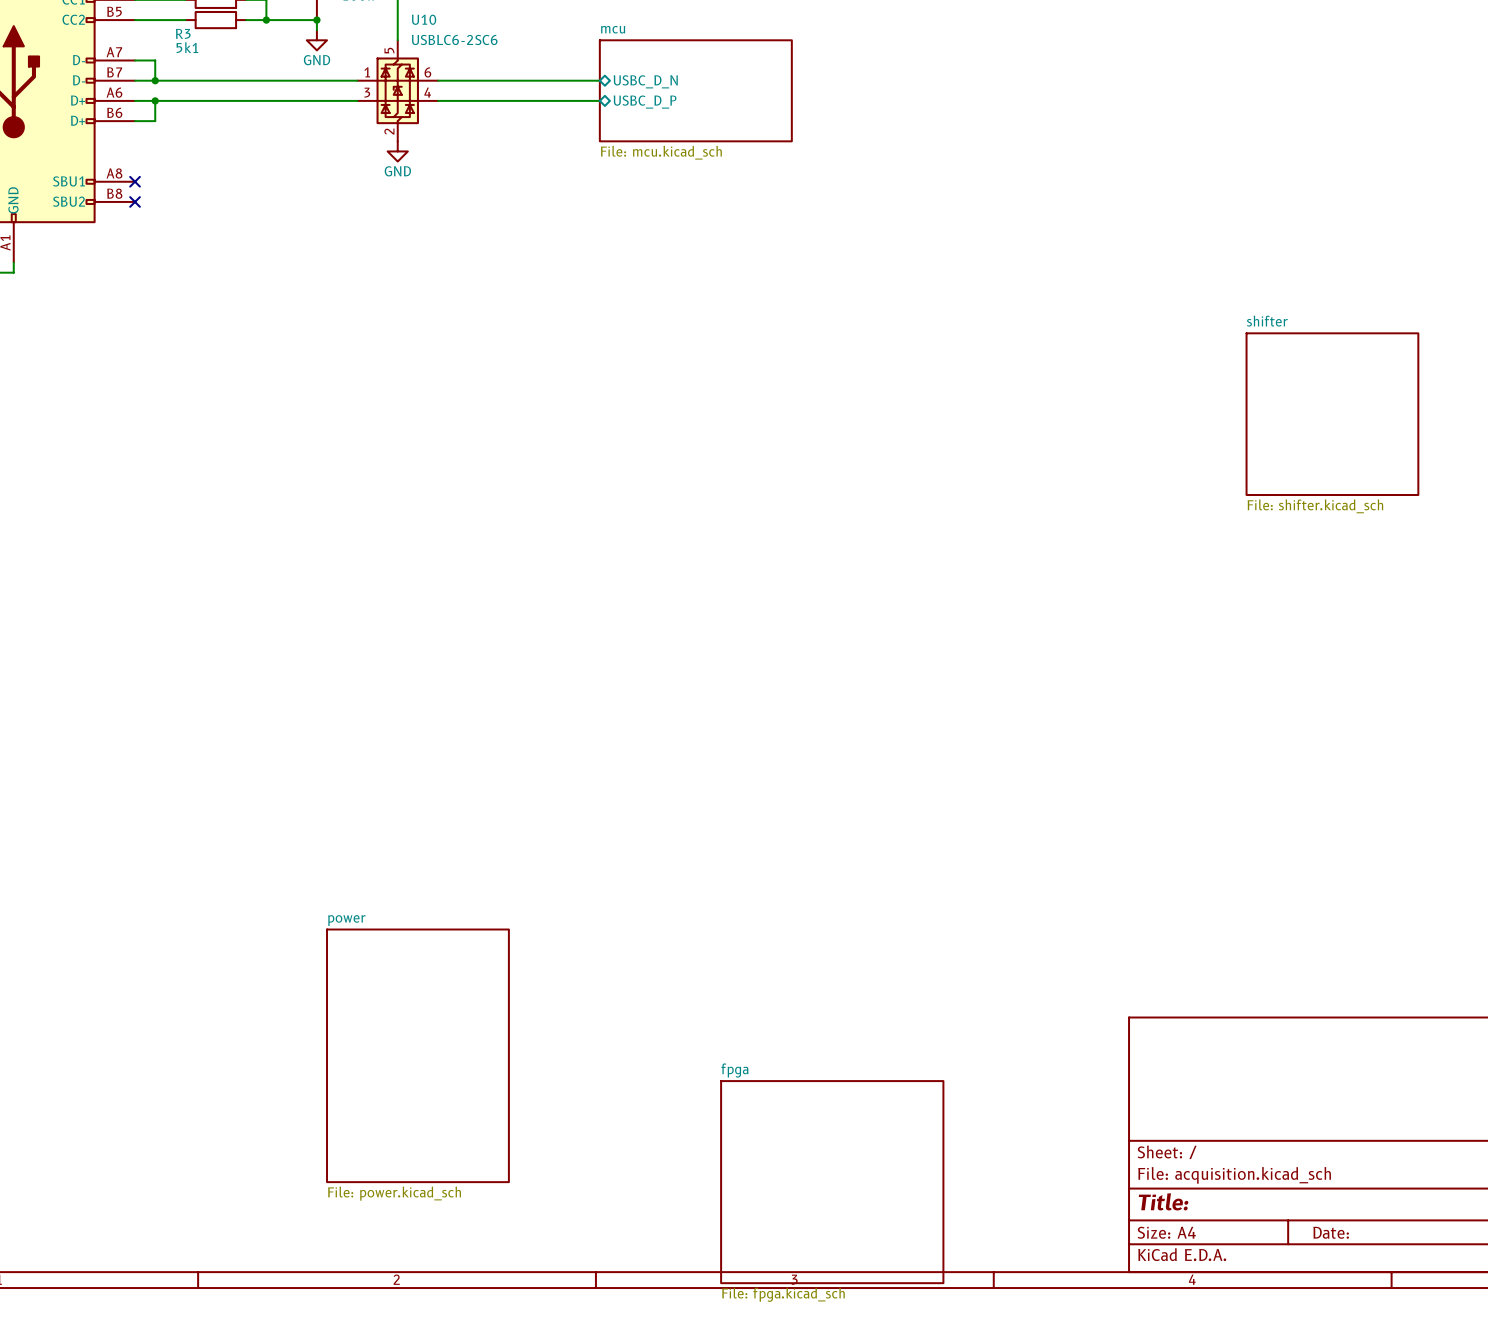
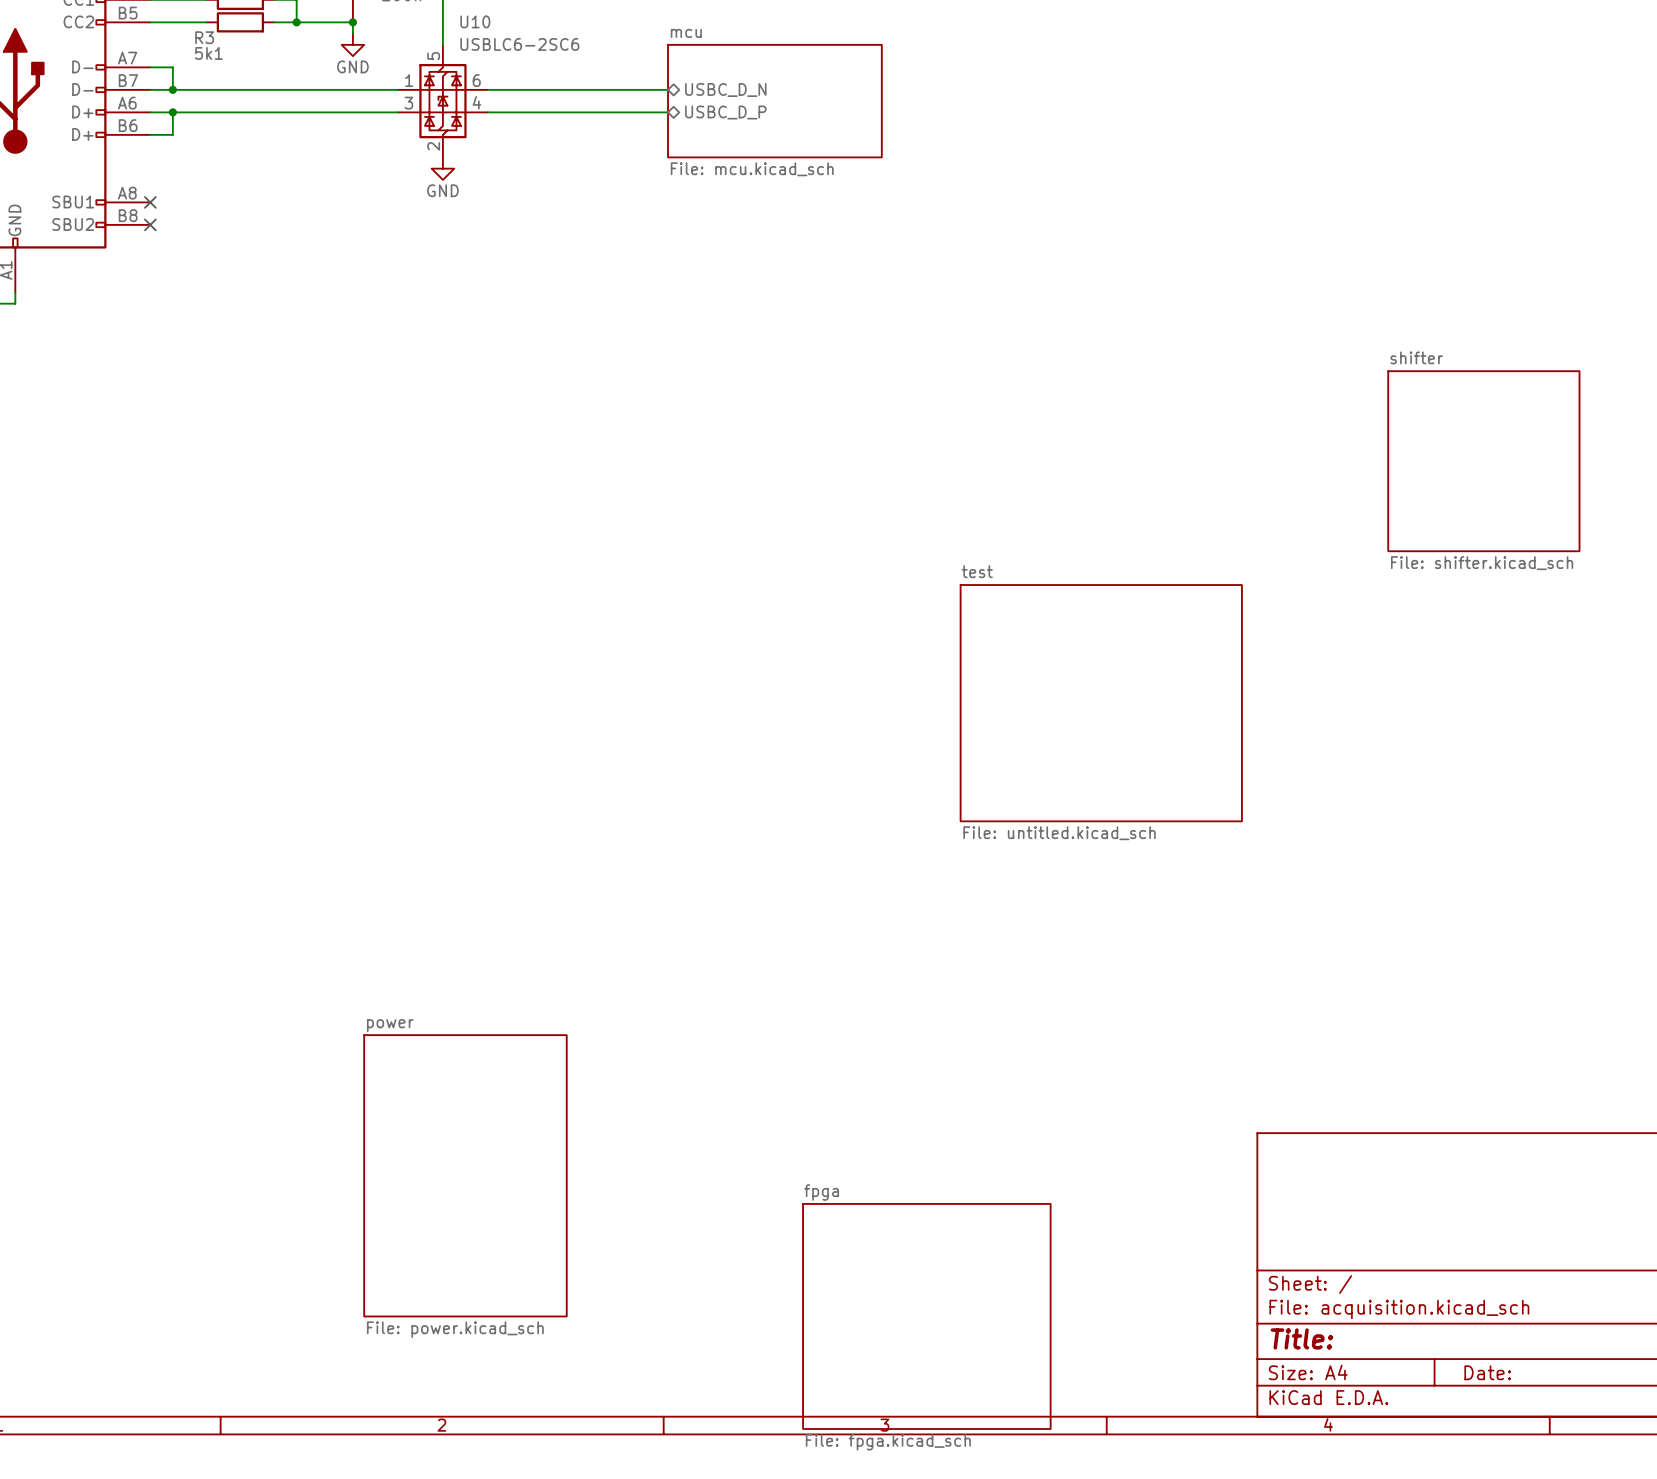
sheet test: none -> File: untitled.kicad_sch (1101, 703)

